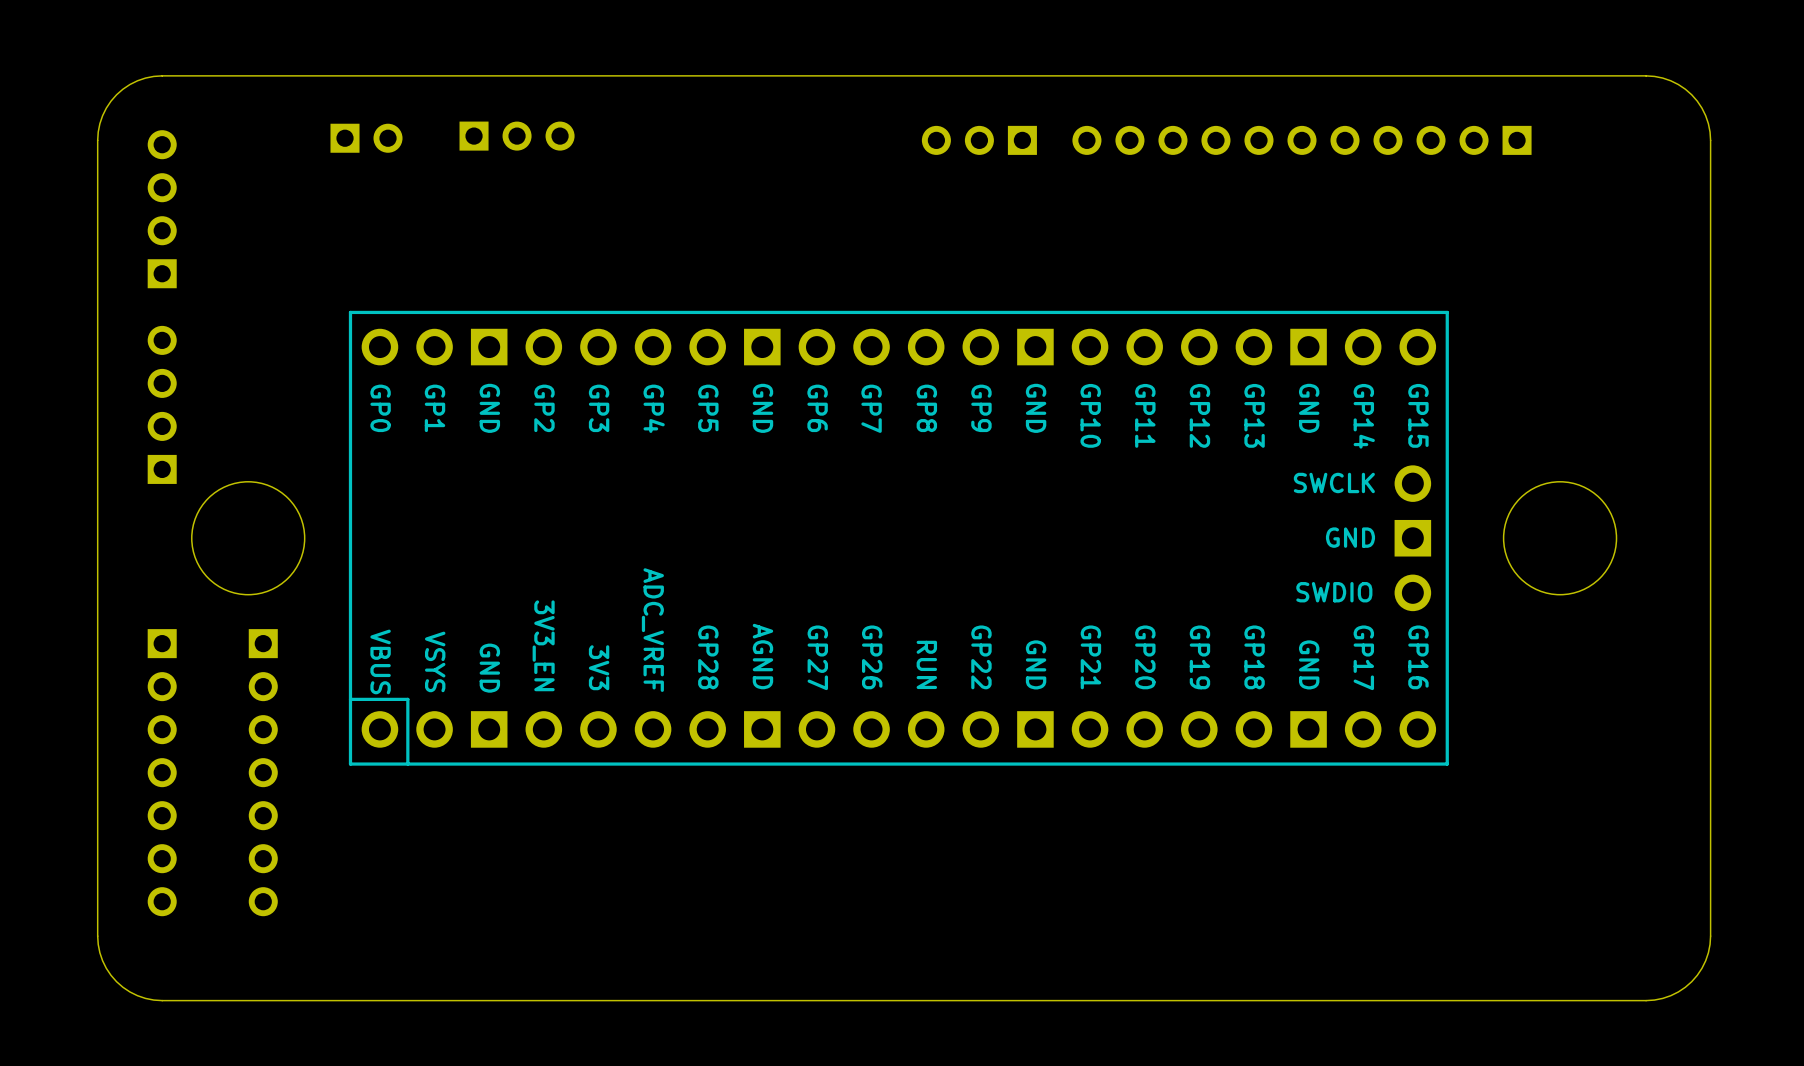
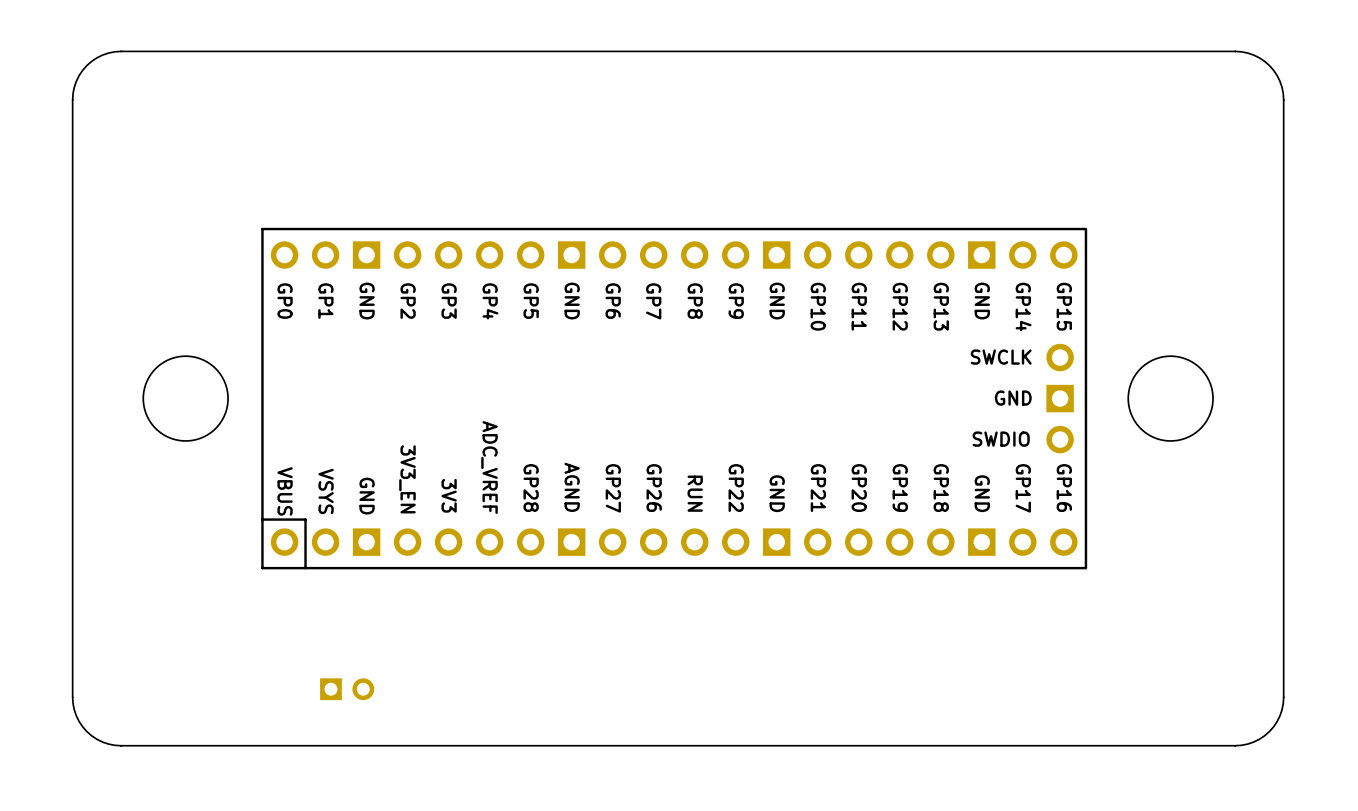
part: (517, 136) -> none
part: (366, 138) -> none
part: (979, 140) -> none
part: (1301, 140) -> none
part: (162, 209) -> none
part: (162, 404) -> none
part: (162, 772) -> none
part: (263, 772) -> none
part: none -> (347, 689)

